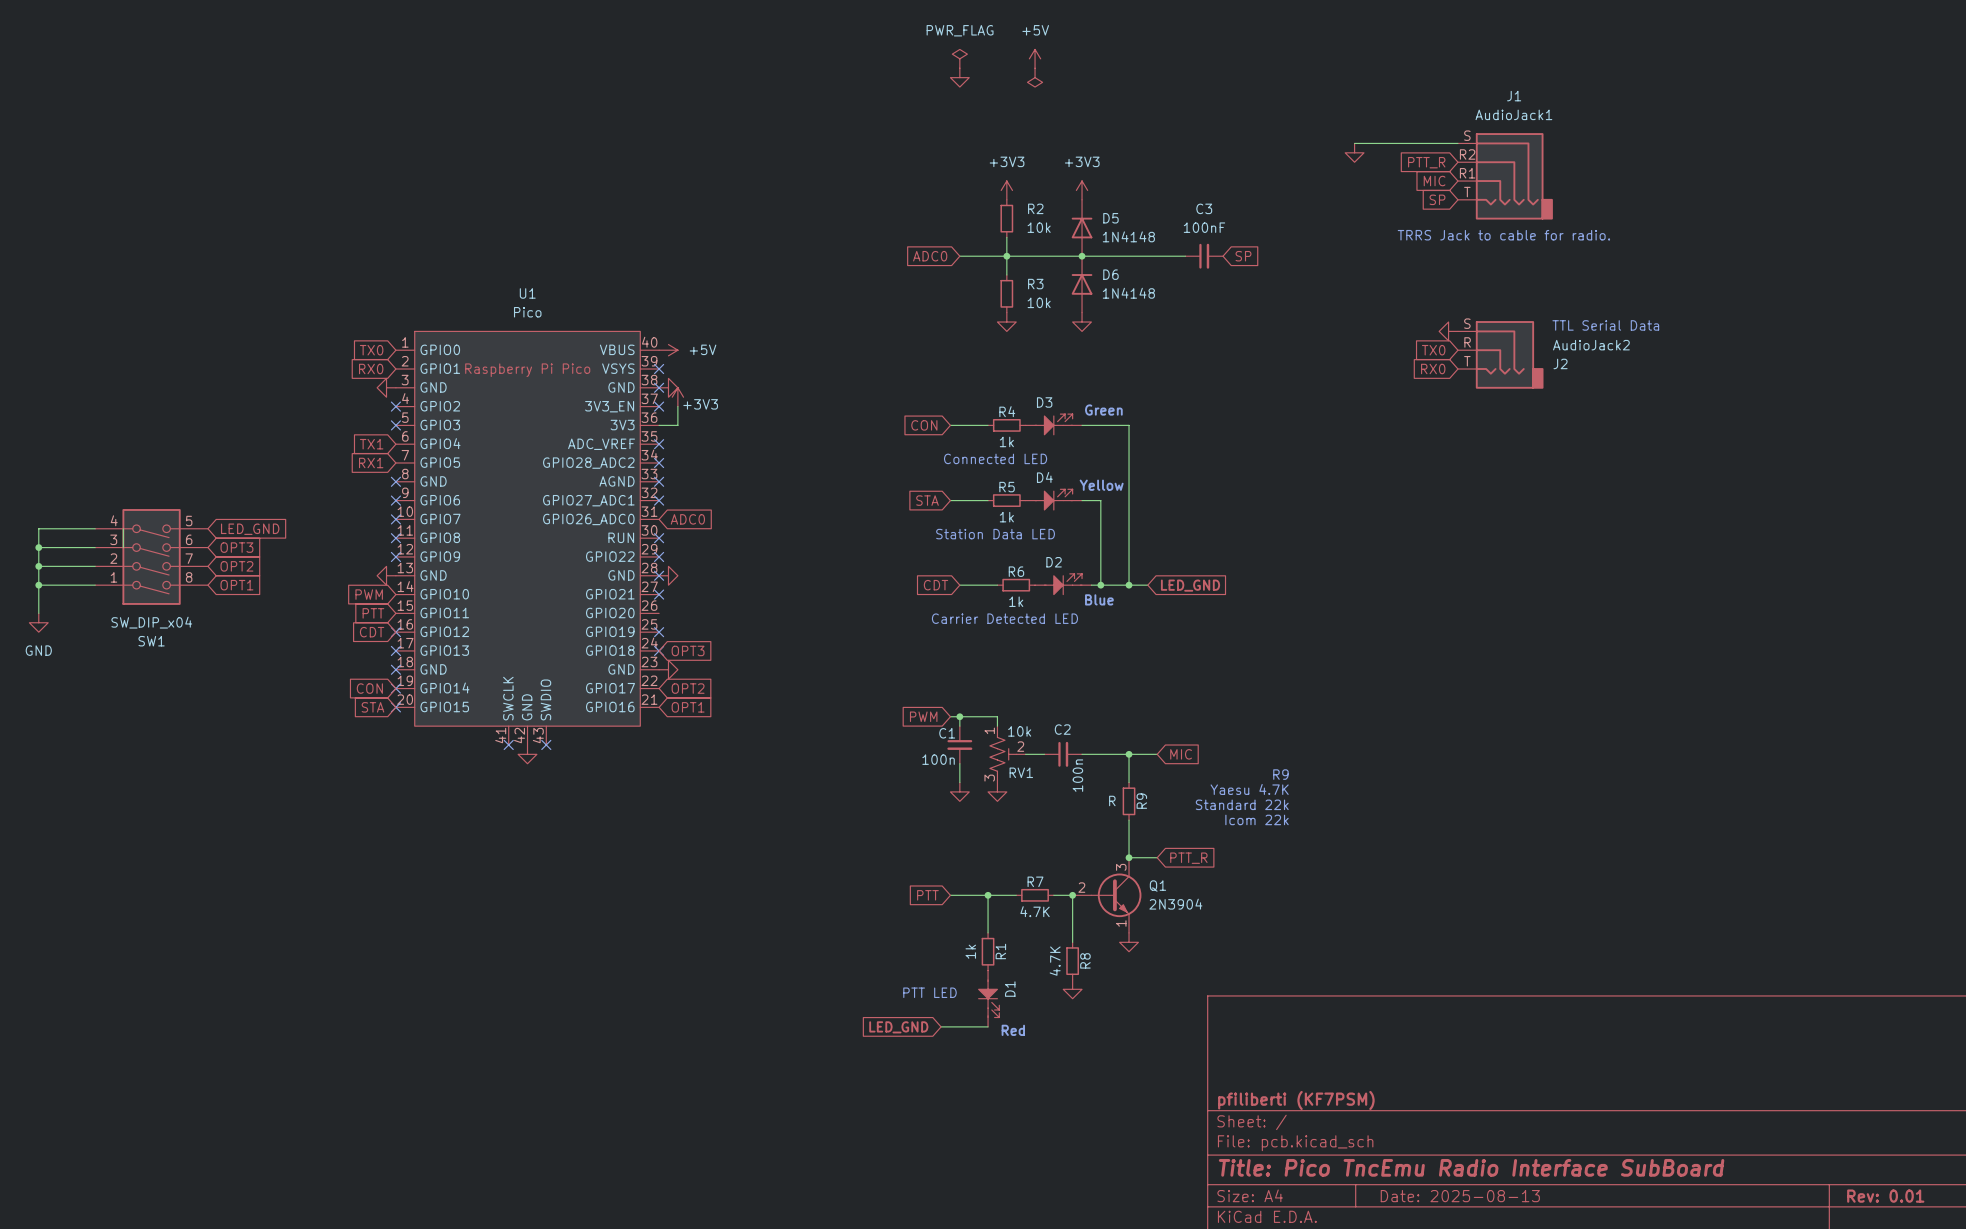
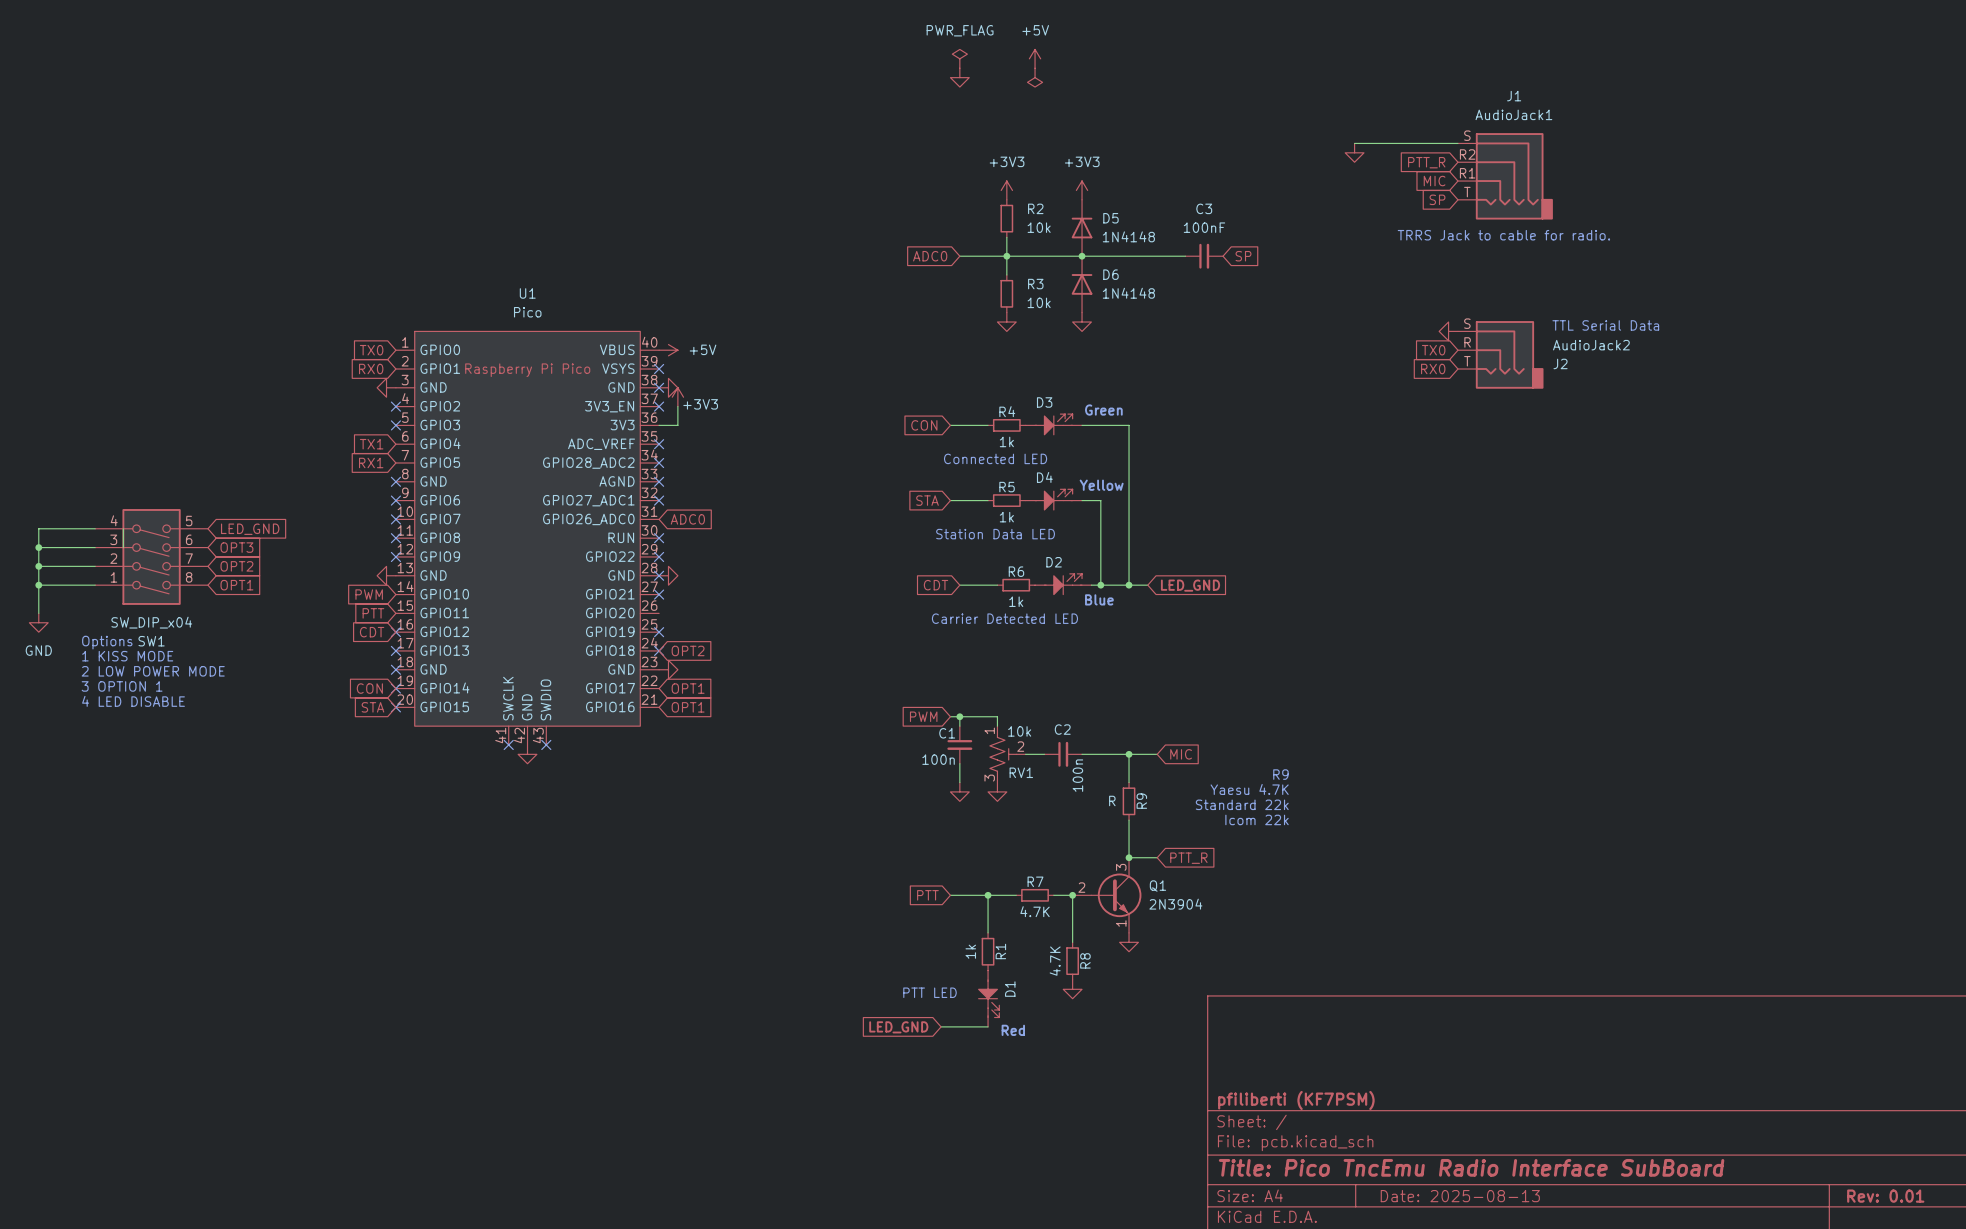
text: none -> Options (107, 642)
global label: OPT3 (688, 650) -> OPT2 (688, 650)
text: none -> 1 KISS MODE (127, 656)
text: none -> 2 LOW POWER MODE (153, 671)
text: none -> 3 OPTION 1 (122, 686)
global label: OPT2 (688, 688) -> OPT1 (688, 688)
text: none -> 4 LED DISABLE (133, 701)

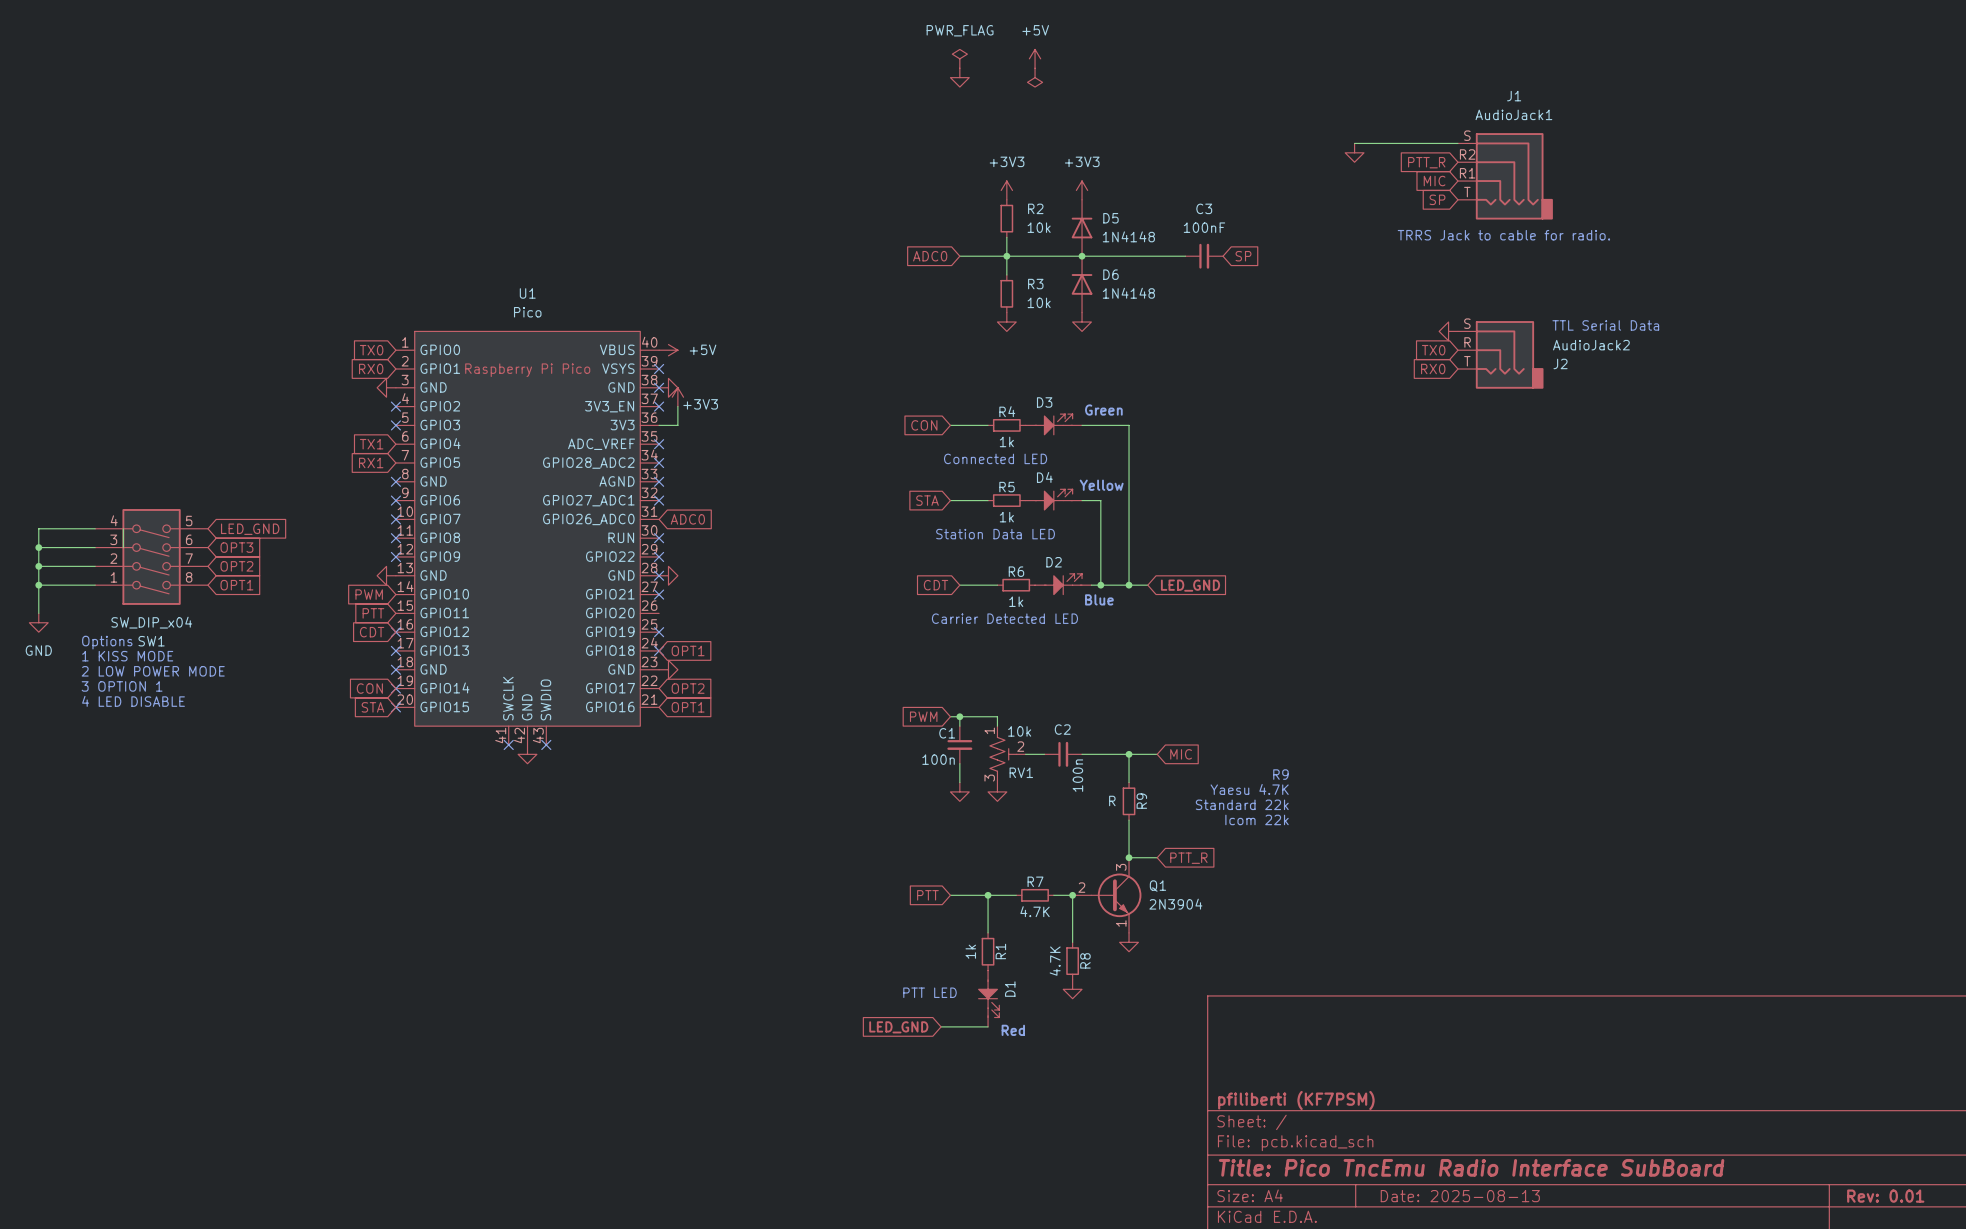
global label: OPT2 (688, 650) -> OPT1 (688, 650)
global label: OPT1 (688, 688) -> OPT2 (688, 688)

